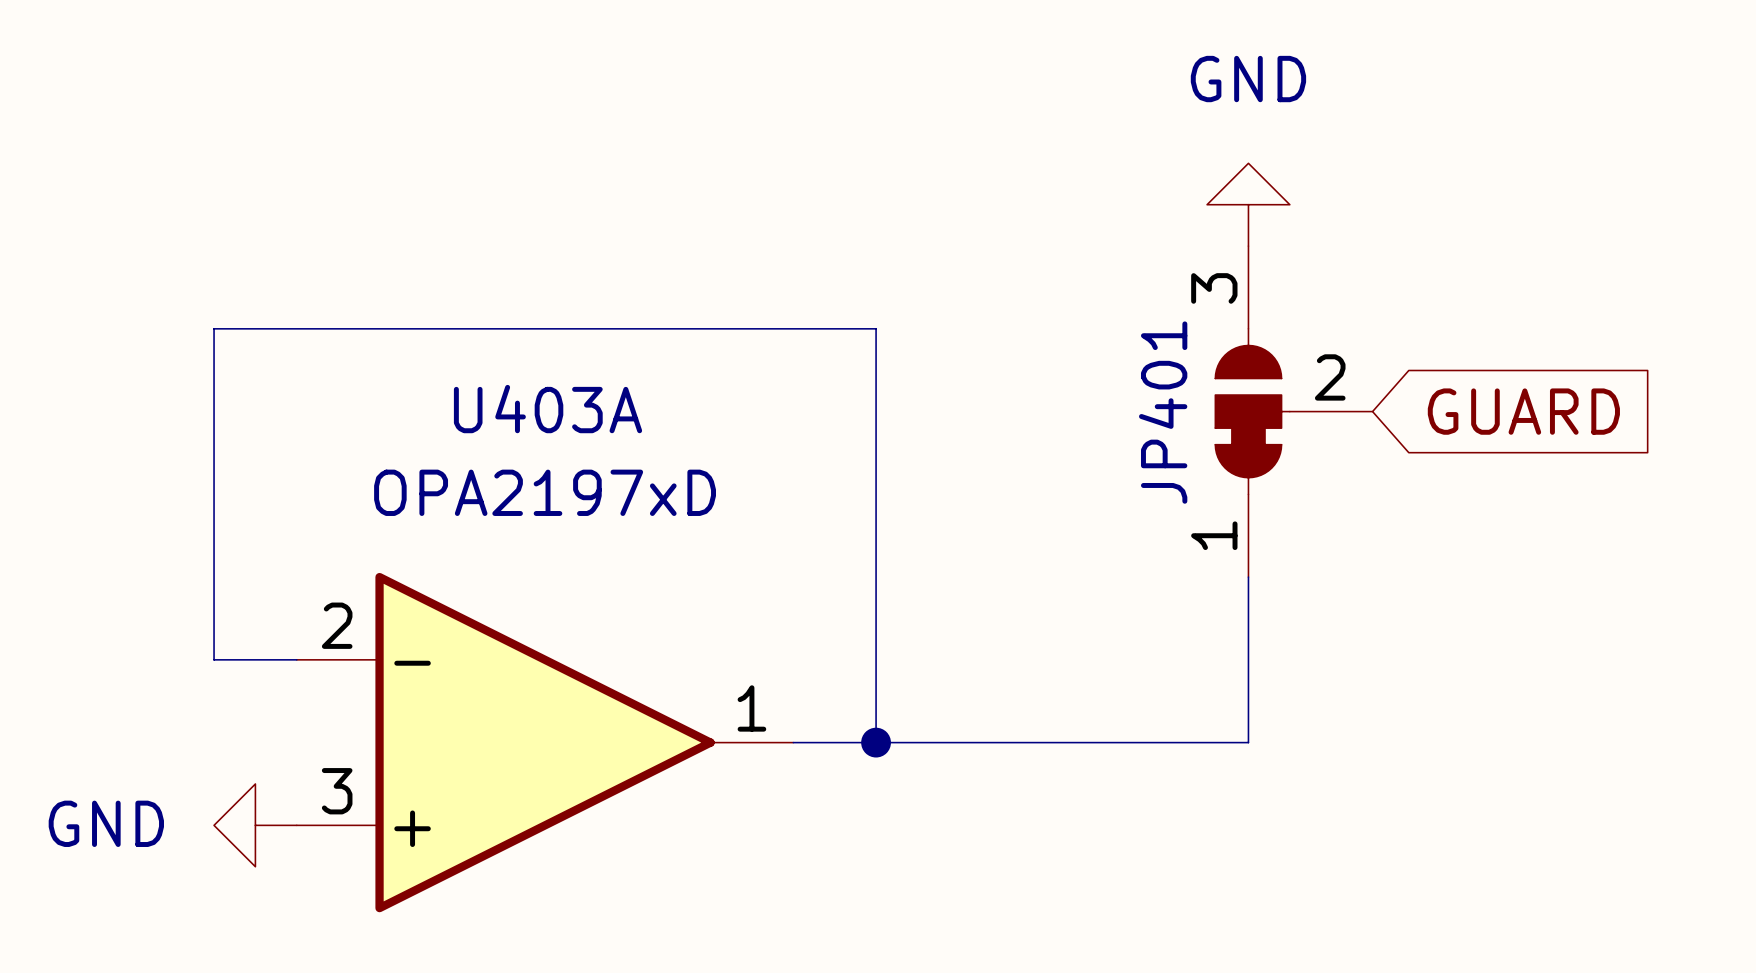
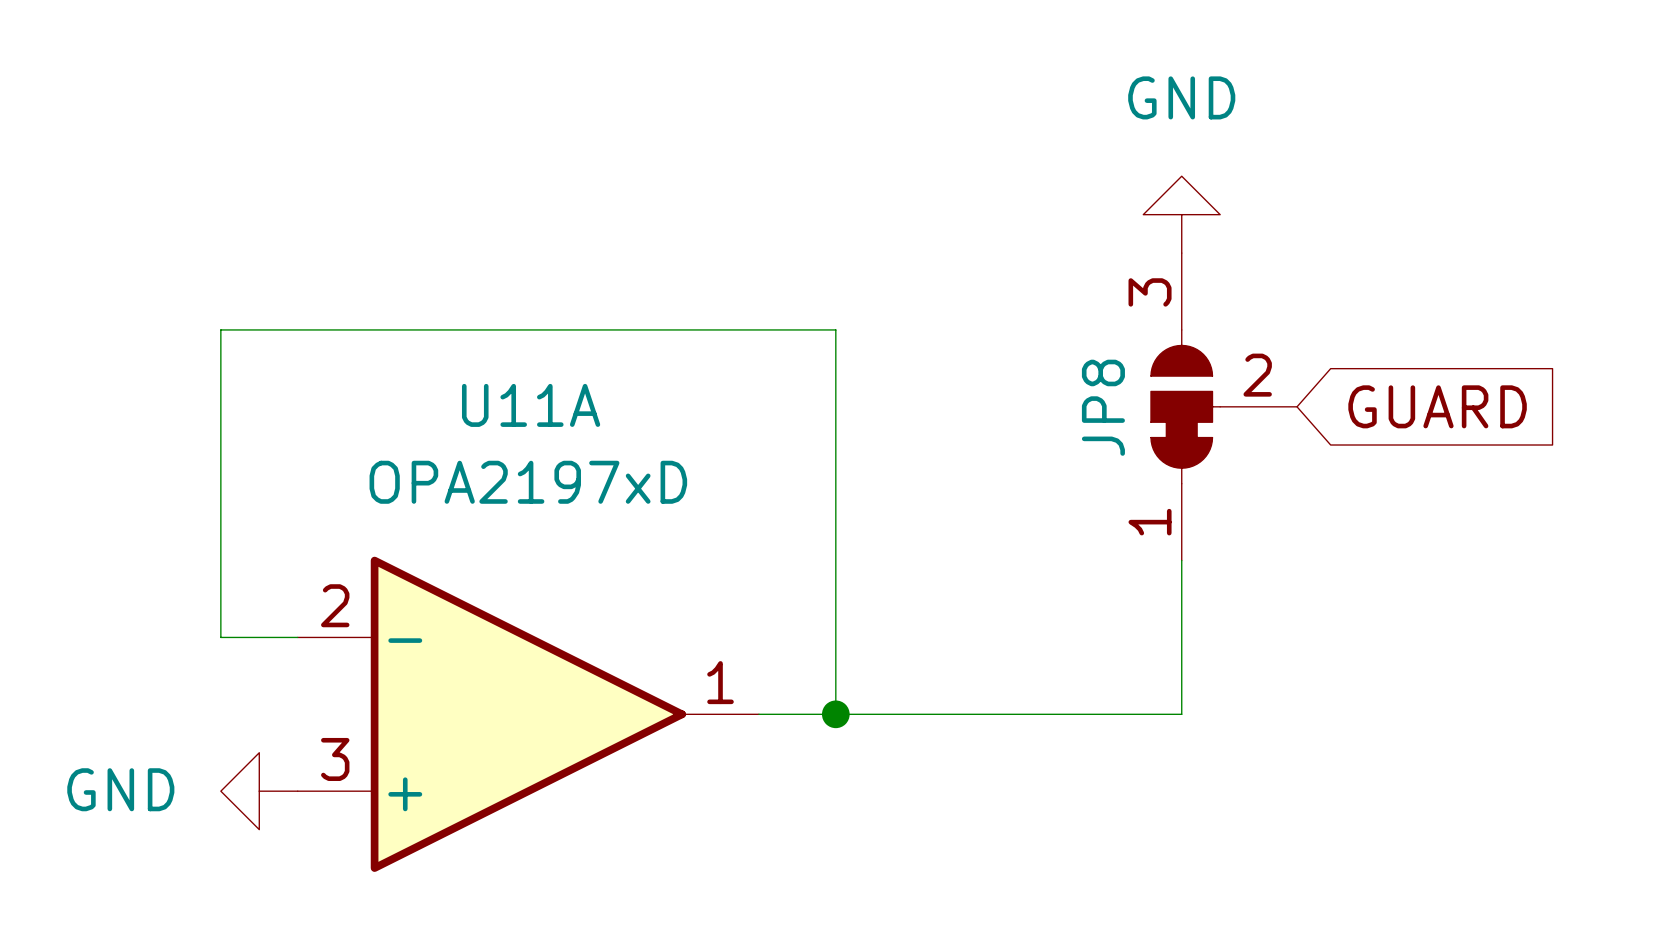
U403A name: U403A (548, 409) -> U11A (531, 405)
JP401 name: JP401 (1163, 412) -> JP8 (1103, 407)

